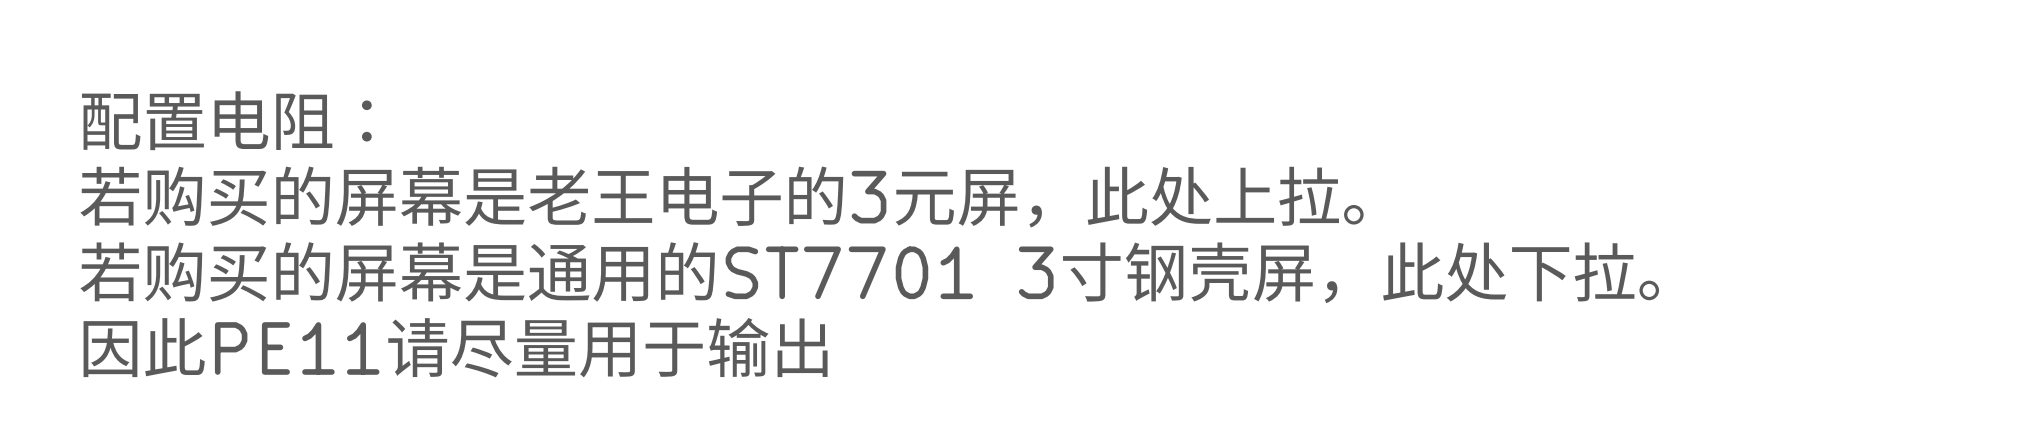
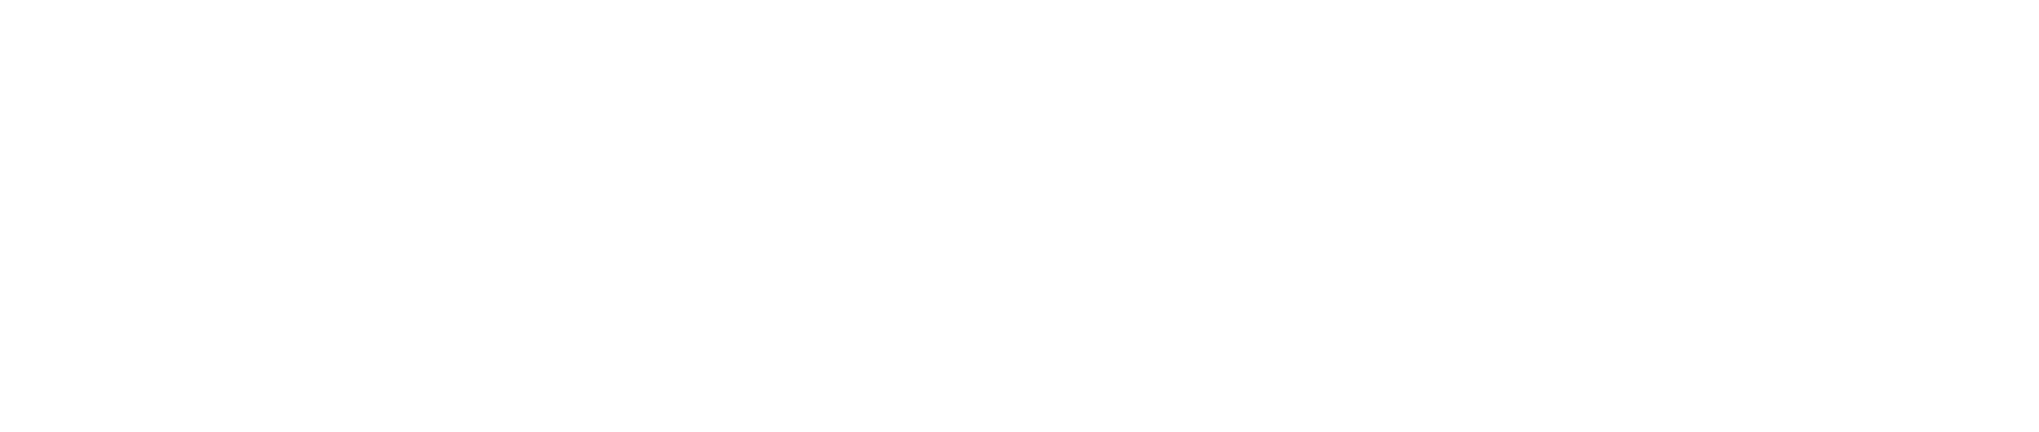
text: 配置电阻： (226, 120) -> none
text: 若购买的屏幕是老王电子的3元屏，此处上拉。 (721, 197) -> none
text: 若购买的屏幕是通用的ST7701 3寸钢壳屏，此处下拉。 (869, 272) -> none
text: 因此PE11请尽量用于输出 (455, 347) -> none

